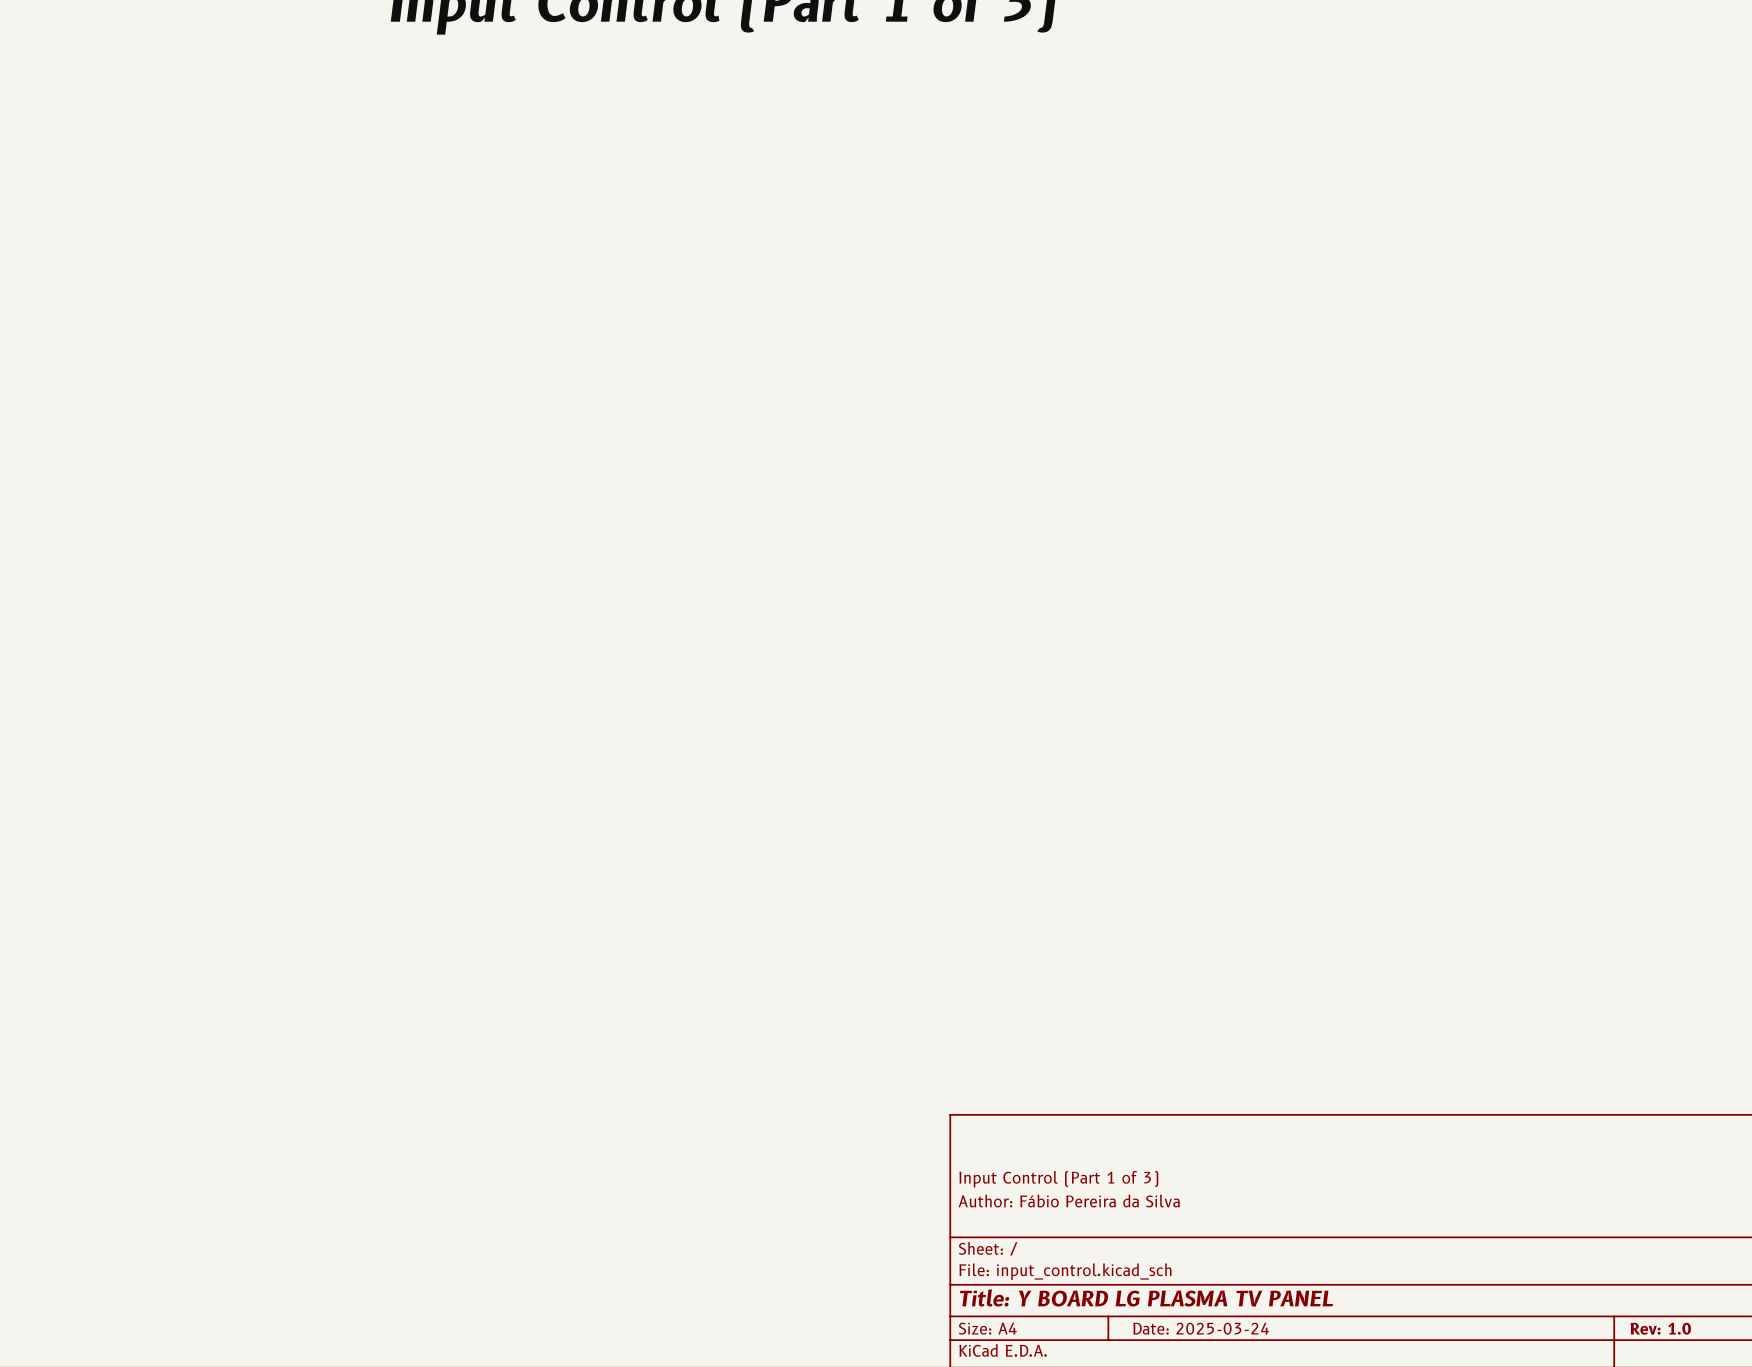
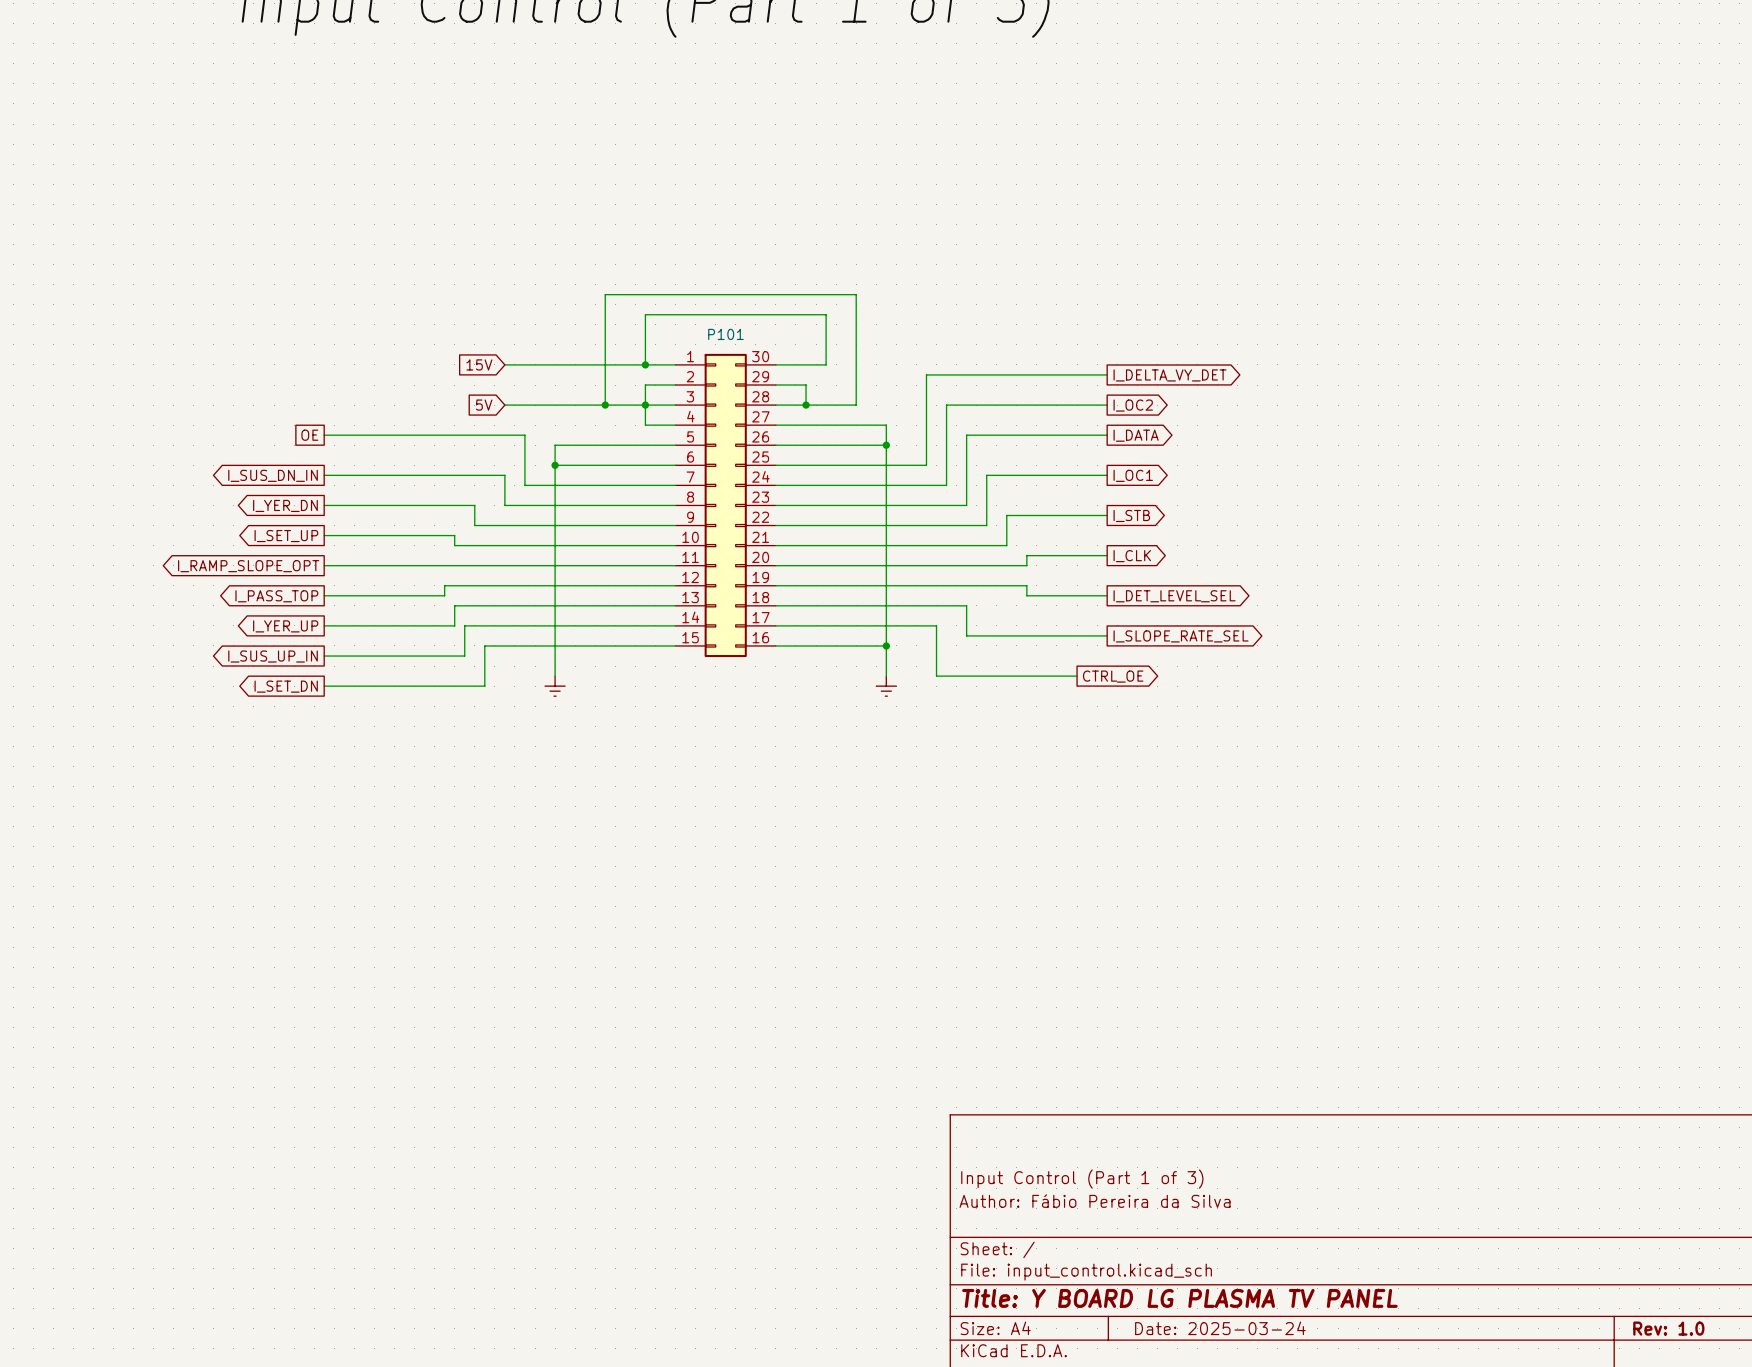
global label: none -> 15V (479, 364)
wire: none -> (504, 364) (675, 364)
wire: none -> (645, 364) (645, 314) (826, 314) (826, 364) (775, 364)
junction: none -> (645, 364)
wire: none -> (1107, 374) (926, 374) (926, 465) (775, 465)
global label: none -> I_DELTA_VY_DET (1170, 375)
wire: none -> (675, 385) (645, 385) (645, 425) (675, 425)
wire: none -> (775, 385) (806, 385) (806, 405)
global label: none -> 5V (484, 405)
wire: none -> (504, 405) (675, 405)
wire: none -> (605, 405) (605, 294) (856, 294) (856, 405) (775, 405)
junction: none -> (605, 405)
junction: none -> (645, 405)
junction: none -> (806, 405)
wire: none -> (1107, 405) (946, 405) (946, 485) (775, 485)
global label: none -> I_OC2 (1133, 405)
wire: none -> (775, 425) (886, 425) (886, 676)
global label: none -> OE (309, 435)
wire: none -> (324, 435) (524, 435) (524, 485) (675, 485)
wire: none -> (1107, 435) (966, 435) (966, 505) (775, 505)
global label: none -> I_DATA (1136, 435)
wire: none -> (675, 445) (555, 445) (555, 676)
wire: none -> (775, 445) (886, 445)
junction: none -> (886, 445)
wire: none -> (555, 465) (675, 465)
junction: none -> (555, 465)
wire: none -> (324, 475) (504, 475) (504, 505) (675, 505)
wire: none -> (1107, 475) (986, 475) (986, 525) (775, 525)
global label: none -> I_SUS_DN_IN (273, 475)
global label: none -> I_OC1 (1133, 475)
wire: none -> (324, 505) (474, 505) (474, 525) (675, 525)
P101: none -> (725, 505)
global label: none -> I_YER_DN (285, 505)
wire: none -> (1107, 515) (1006, 515) (1006, 545) (775, 545)
global label: none -> I_STB (1131, 515)
wire: none -> (324, 535) (454, 535) (454, 545) (675, 545)
global label: none -> I_SET_UP (286, 536)
wire: none -> (1107, 555) (1026, 555) (1026, 565) (775, 565)
global label: none -> I_CLK (1132, 556)
wire: none -> (324, 565) (675, 565)
global label: none -> I_RAMP_SLOPE_OPT (248, 566)
wire: none -> (675, 585) (444, 585) (444, 595) (324, 595)
wire: none -> (775, 585) (1026, 585) (1026, 595) (1107, 595)
global label: none -> I_PASS_TOP (276, 596)
global label: none -> I_DET_LEVEL_SEL (1174, 596)
wire: none -> (675, 605) (454, 605) (454, 625) (324, 625)
wire: none -> (775, 605) (966, 605) (966, 635) (1107, 635)
wire: none -> (675, 625) (464, 625) (464, 656) (324, 656)
wire: none -> (775, 625) (936, 625) (936, 676) (1077, 676)
global label: none -> I_YER_UP (285, 626)
global label: none -> I_SLOPE_RATE_SEL (1181, 636)
wire: none -> (675, 645) (484, 645) (484, 686) (324, 686)
wire: none -> (775, 645) (886, 645)
junction: none -> (886, 645)
global label: none -> I_SUS_UP_IN (273, 656)
global label: none -> CTRL_OE (1113, 676)
power symbol: none -> (555, 686)
power symbol: none -> (886, 686)
global label: none -> I_SET_DN (286, 686)

